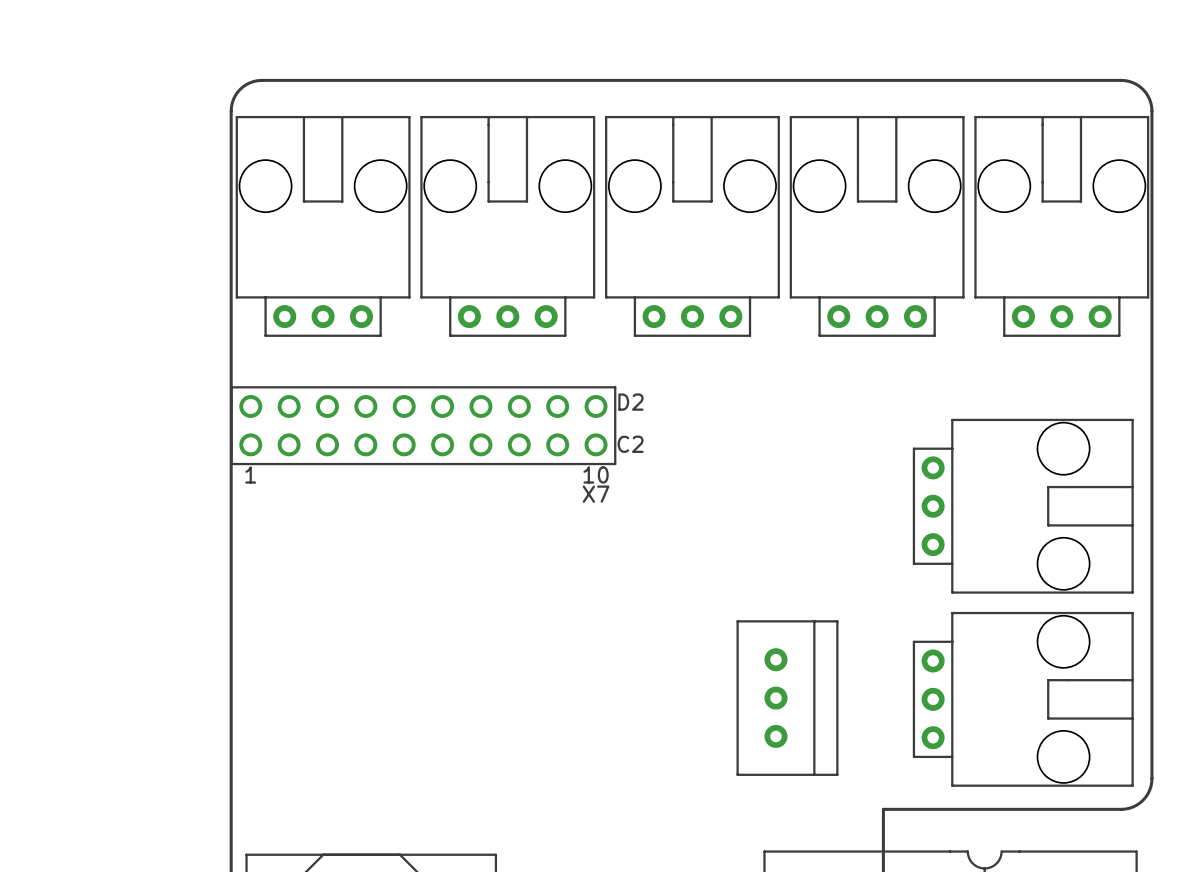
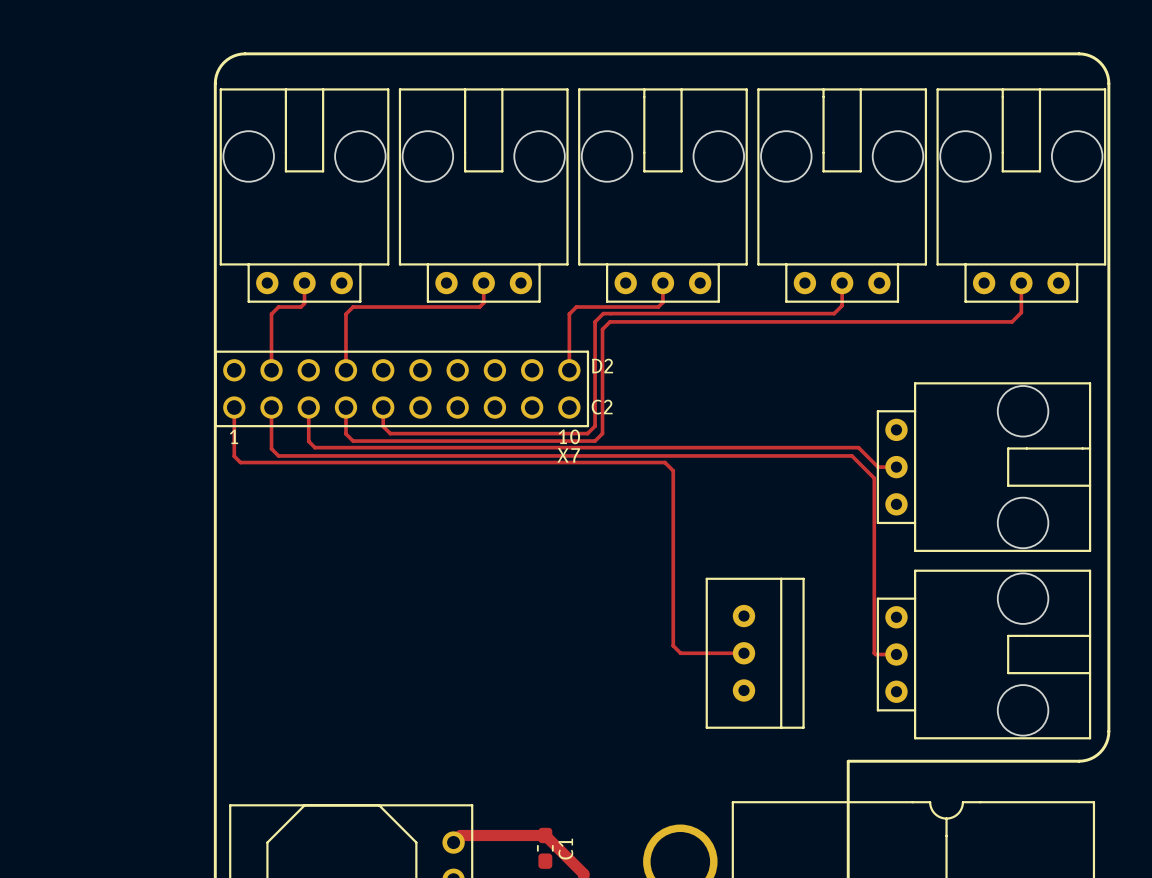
track: none -> (304, 283) (304, 303) (300, 307) (278, 307) (271, 314) (271, 370)
track: none -> (483, 283) (483, 302) (479, 307) (353, 307) (345, 314) (345, 370)
track: none -> (656, 283) (662, 283) (662, 302) (658, 307) (576, 307) (569, 314) (569, 370)
track: none -> (842, 283) (842, 305) (834, 313) (603, 313) (595, 321) (595, 426) (587, 433) (390, 433) (383, 426) (383, 407)
track: none -> (1021, 283) (1021, 312) (1012, 321) (609, 321) (602, 329) (602, 433) (595, 441) (353, 441) (345, 433) (345, 407)
track: none -> (234, 407) (234, 456) (240, 462) (664, 462) (673, 470) (673, 645) (680, 653) (743, 653)
track: none -> (271, 407) (271, 448) (278, 455) (851, 455) (874, 478) (874, 653) (896, 654)
track: none -> (308, 407) (308, 441) (314, 447) (858, 447) (878, 467) (896, 467)

